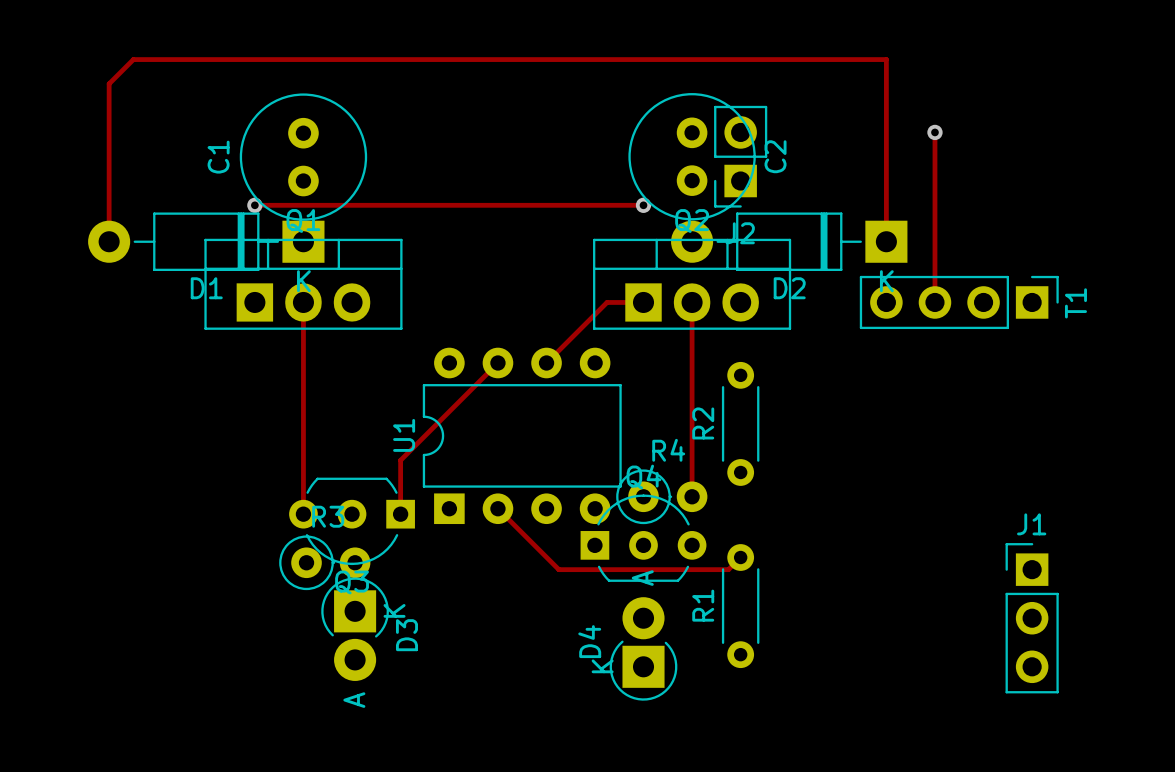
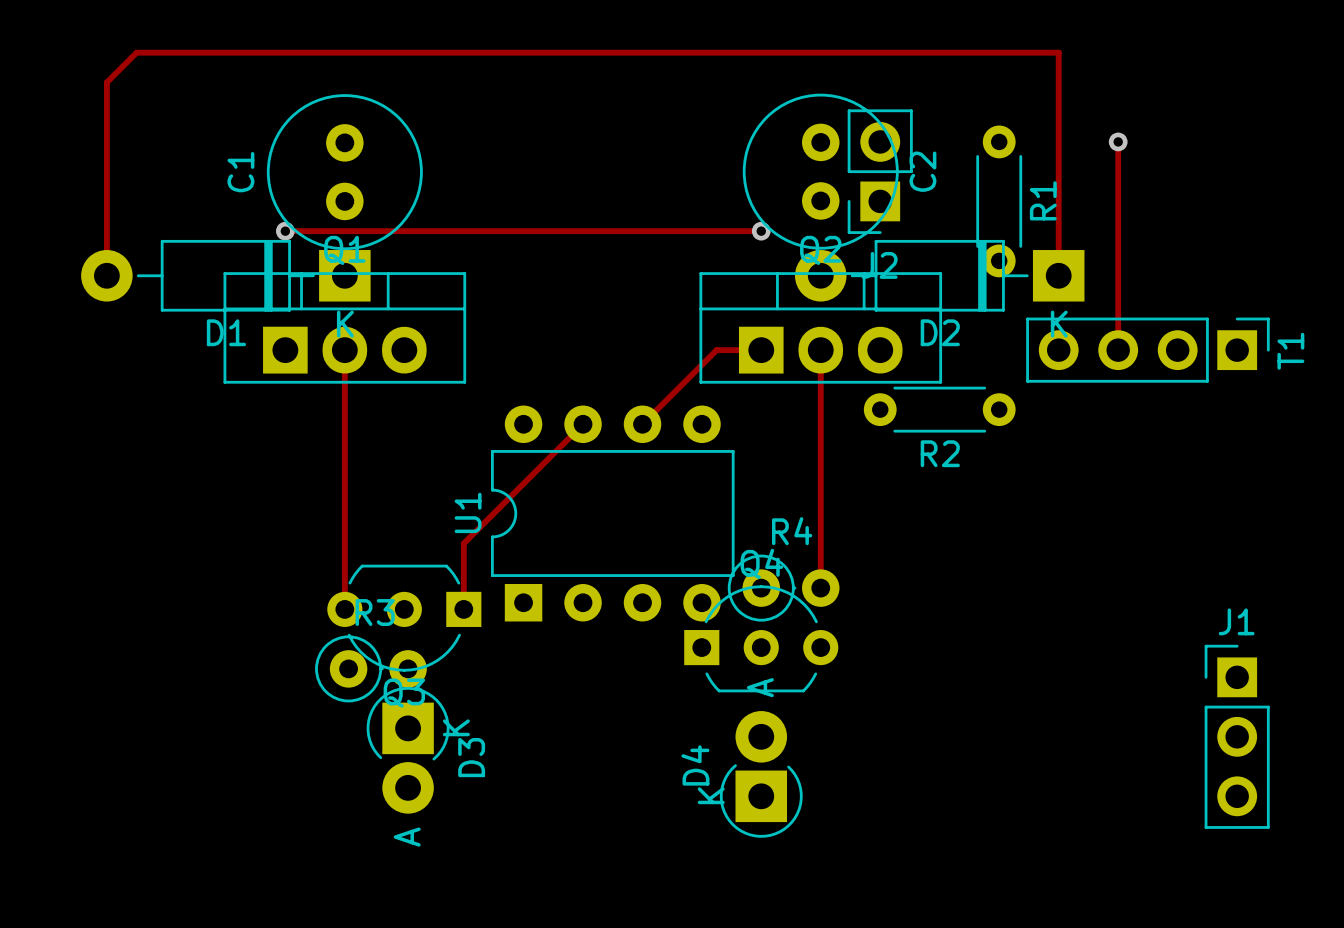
R2 name position: R2 (703, 423) -> R2 (940, 453)
R2 rotation: 0° (740, 423) -> 90° clockwise (939, 409)
R2 position: (740, 423) -> (939, 409)
track: (497, 508) (558, 569) (728, 569) (740, 557) -> none
R1 name position: R1 (703, 605) -> R1 (1043, 200)
R1 position: (740, 606) -> (999, 201)

